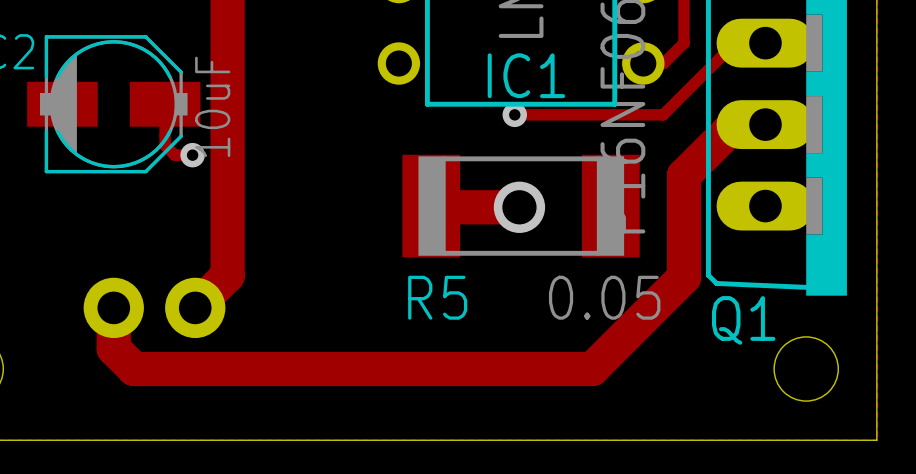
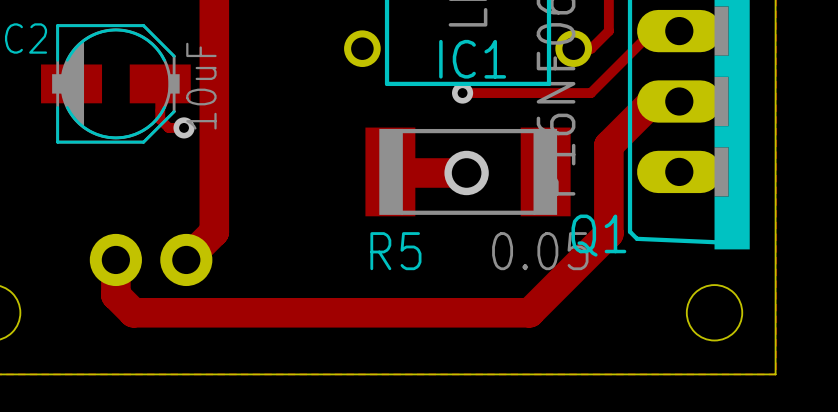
Q1 name position: Q1 (743, 320) -> Q1 (598, 235)

